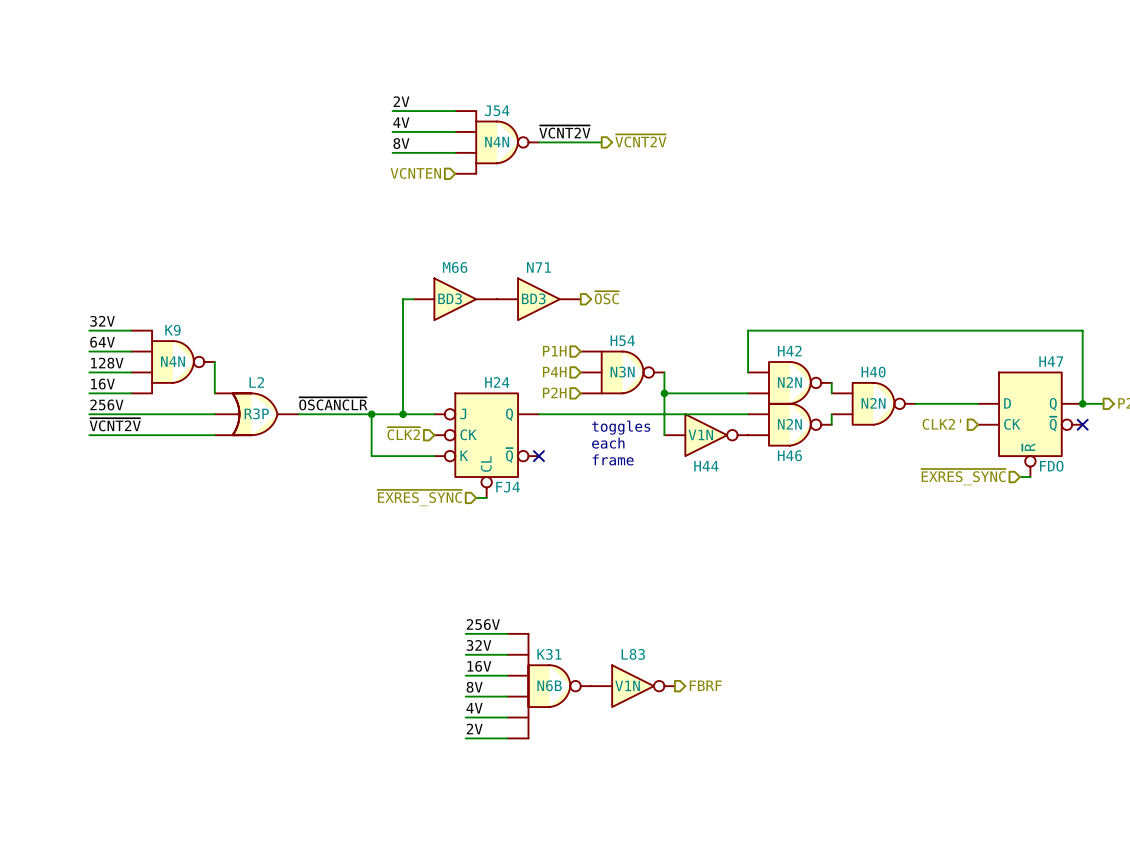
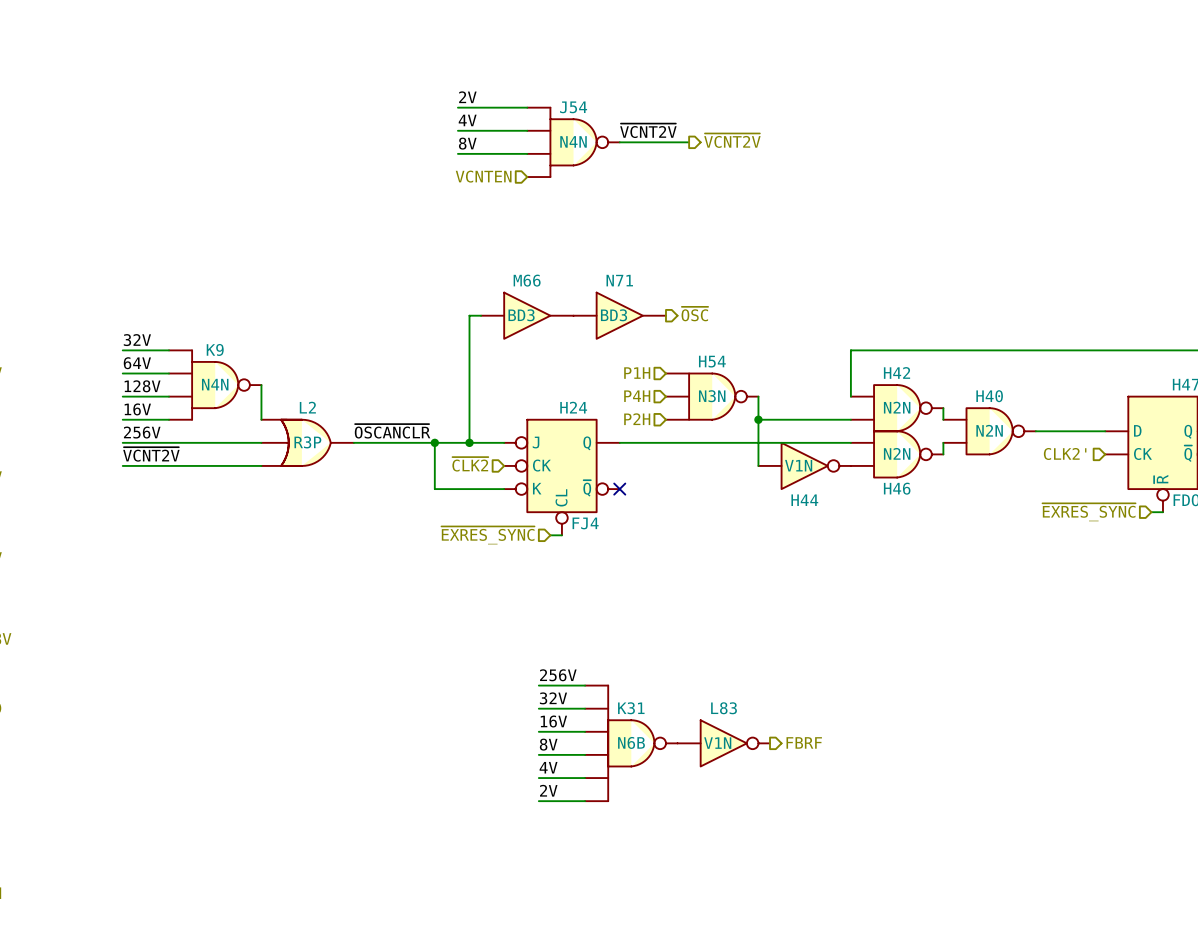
text: toggles (621, 427) -> none
text: each (608, 443) -> none
text: frame (613, 459) -> none

